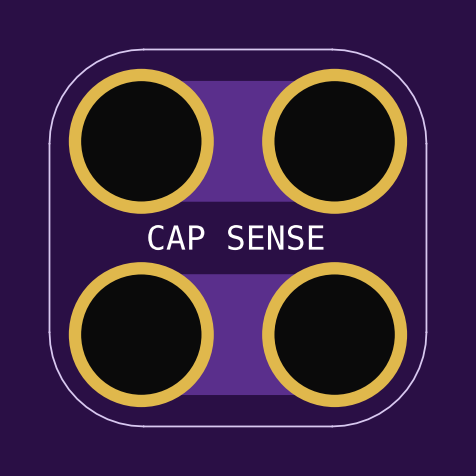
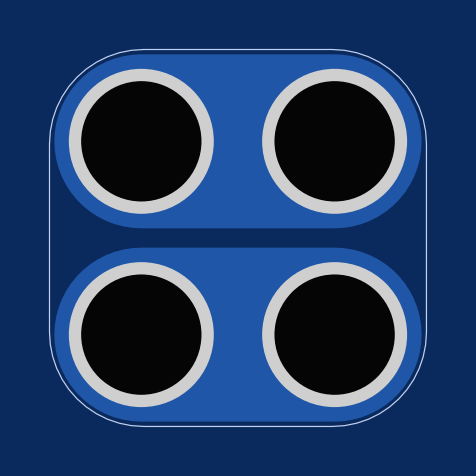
part footprint: [49, 49, 427, 427] -> [49, 49, 427, 427]

